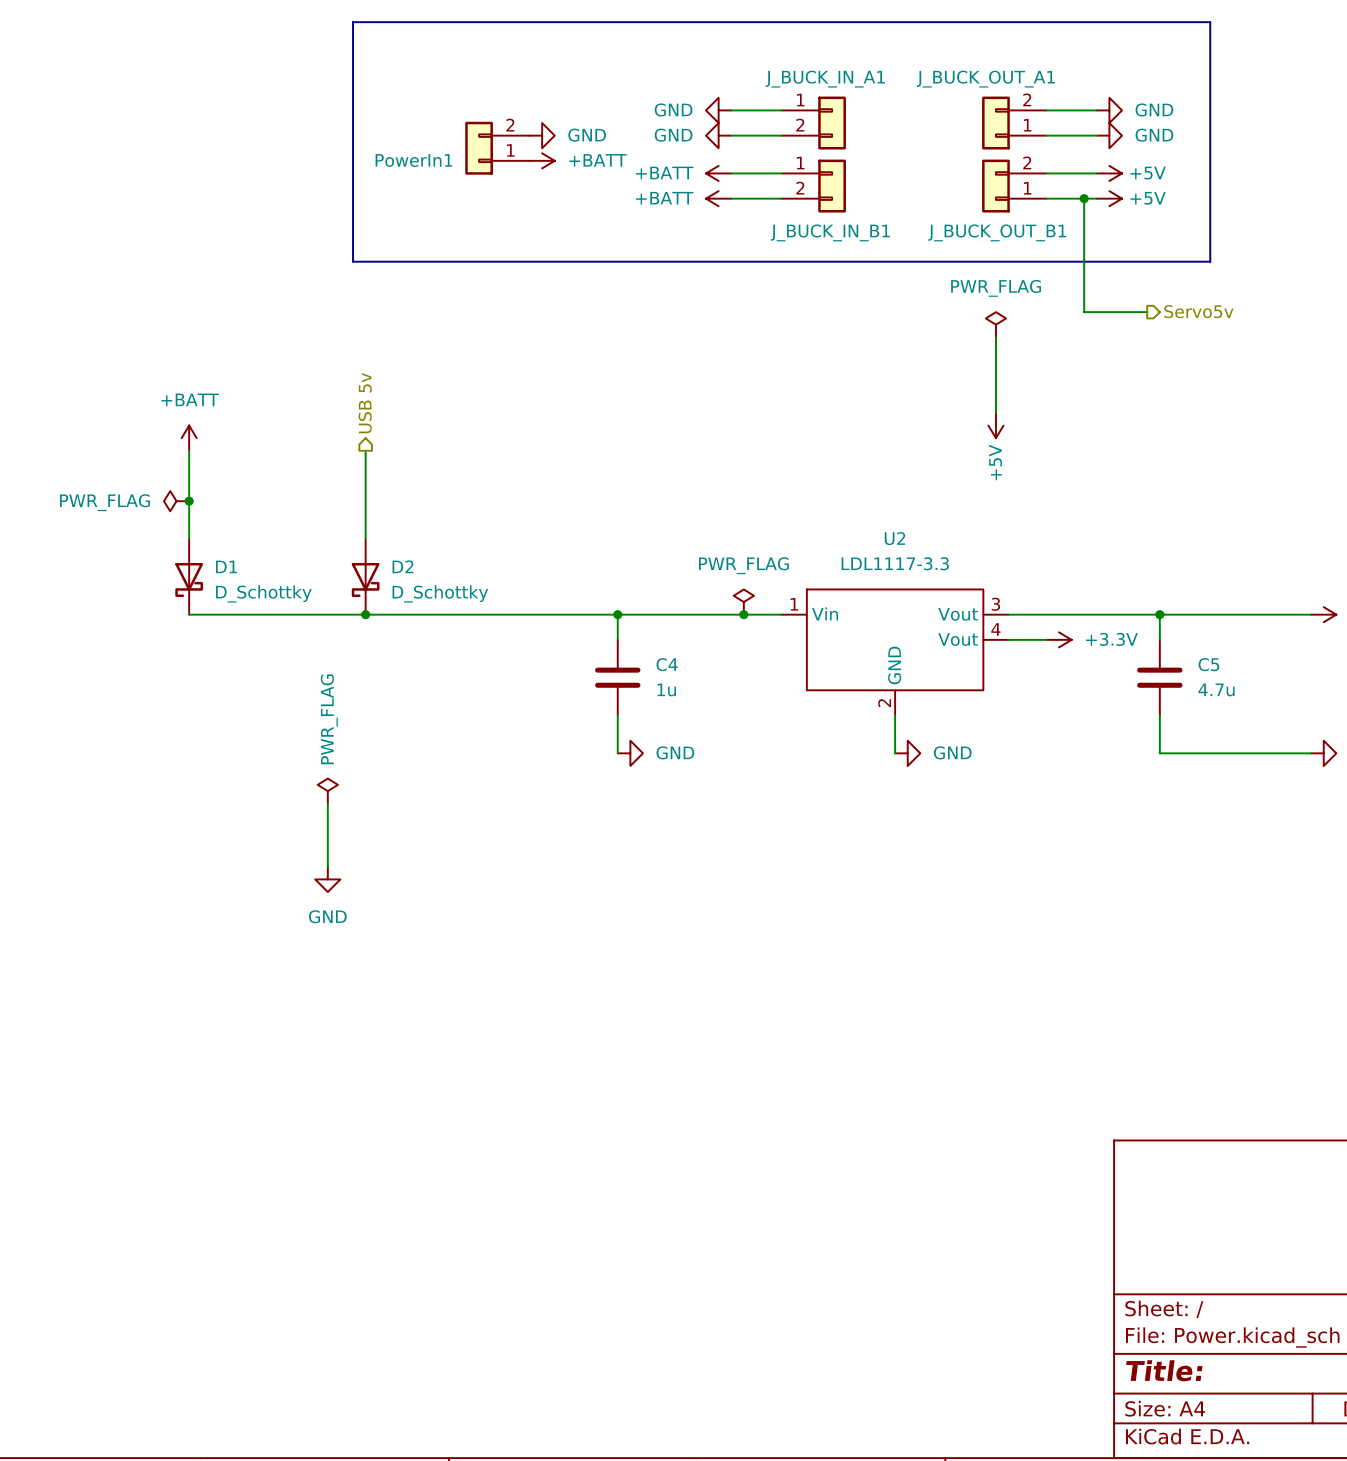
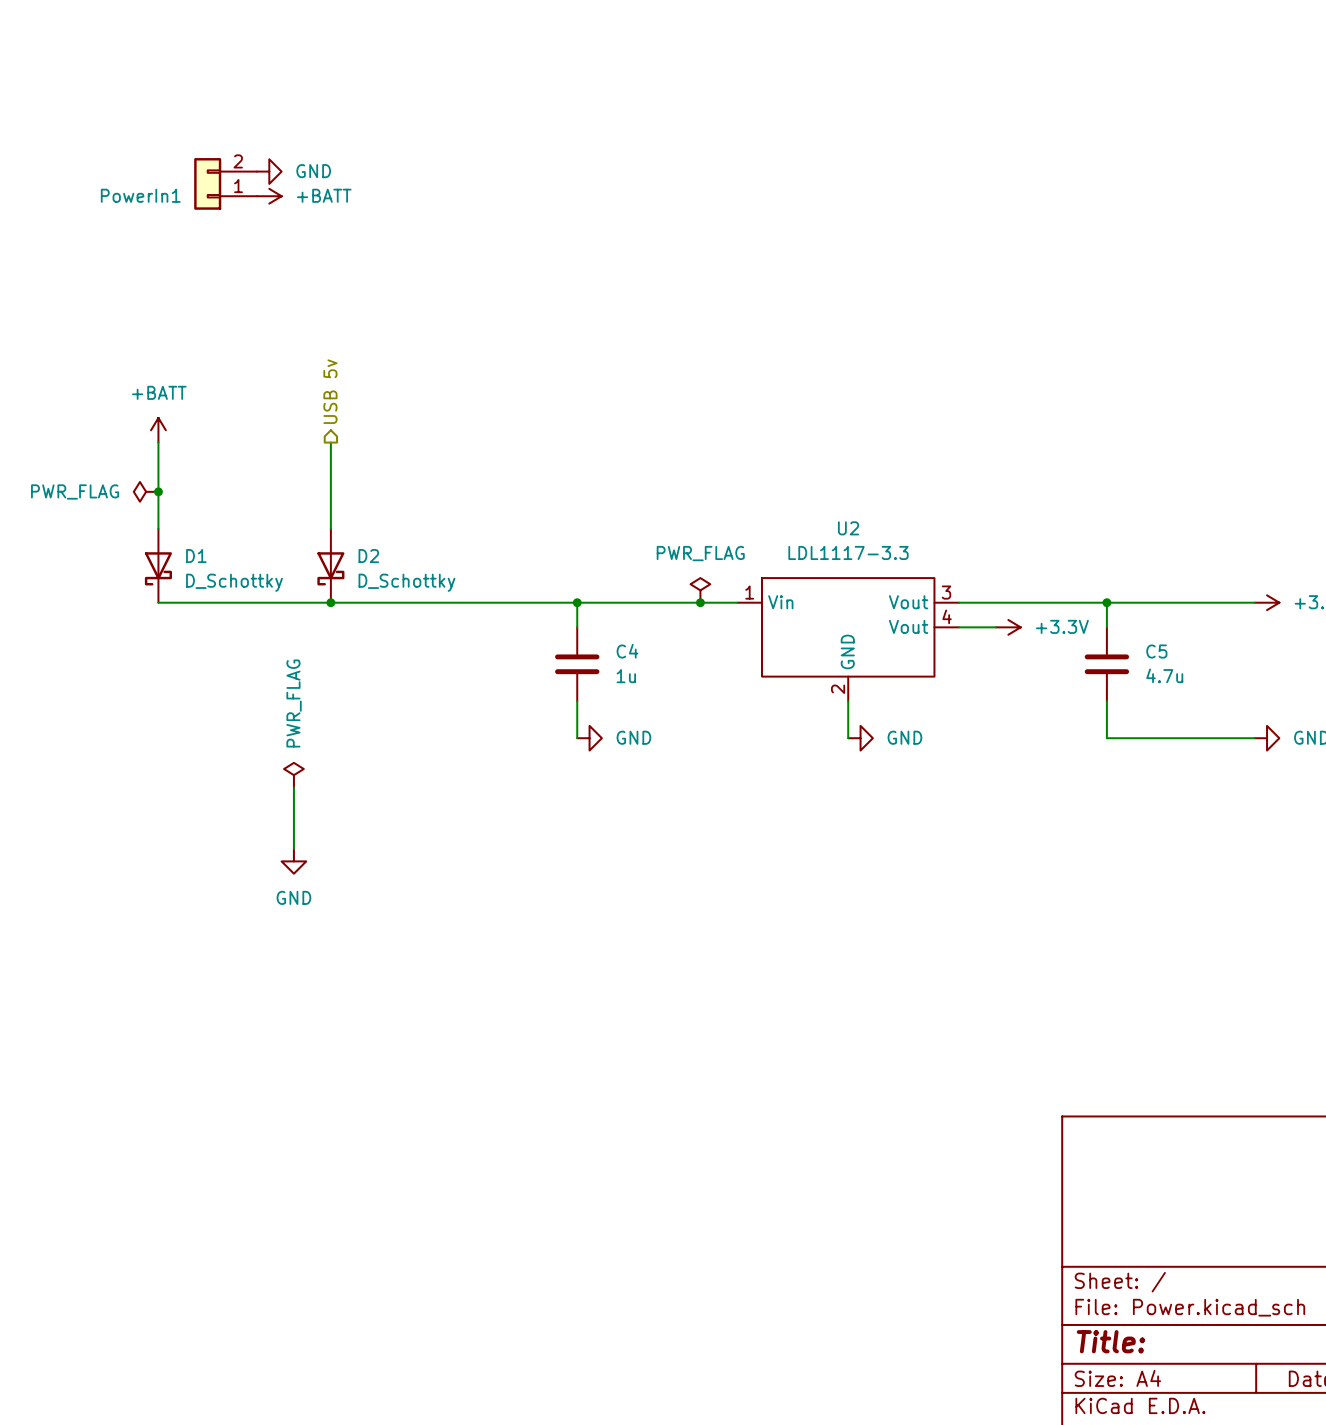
line: (353, 22) (1210, 22) (1210, 261) (353, 261) (353, 22) -> none
power symbol: GND (718, 110) -> none
wire: (731, 110) (781, 110) -> none
wire: (1046, 110) (1096, 110) -> none
power symbol: GND (1109, 110) -> none
J_BUCK_IN_A1: (813, 123) -> none
J_BUCK_OUT_A1: (1014, 123) -> none
power symbol: GND (542, 135) -> none
power symbol: GND (718, 135) -> none
wire: (731, 135) (781, 135) -> none
wire: (1046, 135) (1096, 135) -> none
power symbol: GND (1109, 135) -> none
PowerIn1 position: (497, 148) -> (225, 183)
power symbol: +BATT (542, 160) -> none
power symbol: none -> GND (269, 171)
power symbol: +BATT (718, 173) -> none
wire: (731, 173) (781, 173) -> none
wire: (1046, 173) (1096, 173) -> none
power symbol: +5V (1109, 173) -> none
J_BUCK_IN_B1: (813, 186) -> none
J_BUCK_OUT_B1: (1014, 186) -> none
power symbol: none -> +BATT (269, 196)
power symbol: +BATT (718, 198) -> none
wire: (731, 198) (781, 198) -> none
wire: (1046, 198) (1096, 198) -> none
wire: (1084, 198) (1084, 312) (1147, 312) -> none
junction: (1084, 198) -> none
power symbol: +5V (1109, 198) -> none
hierarchical label: Servo5v (1198, 311) -> none
power symbol: PWR_FLAG (995, 324) -> none
wire: (995, 337) (995, 412) -> none
power symbol: +5V (995, 425) -> none

